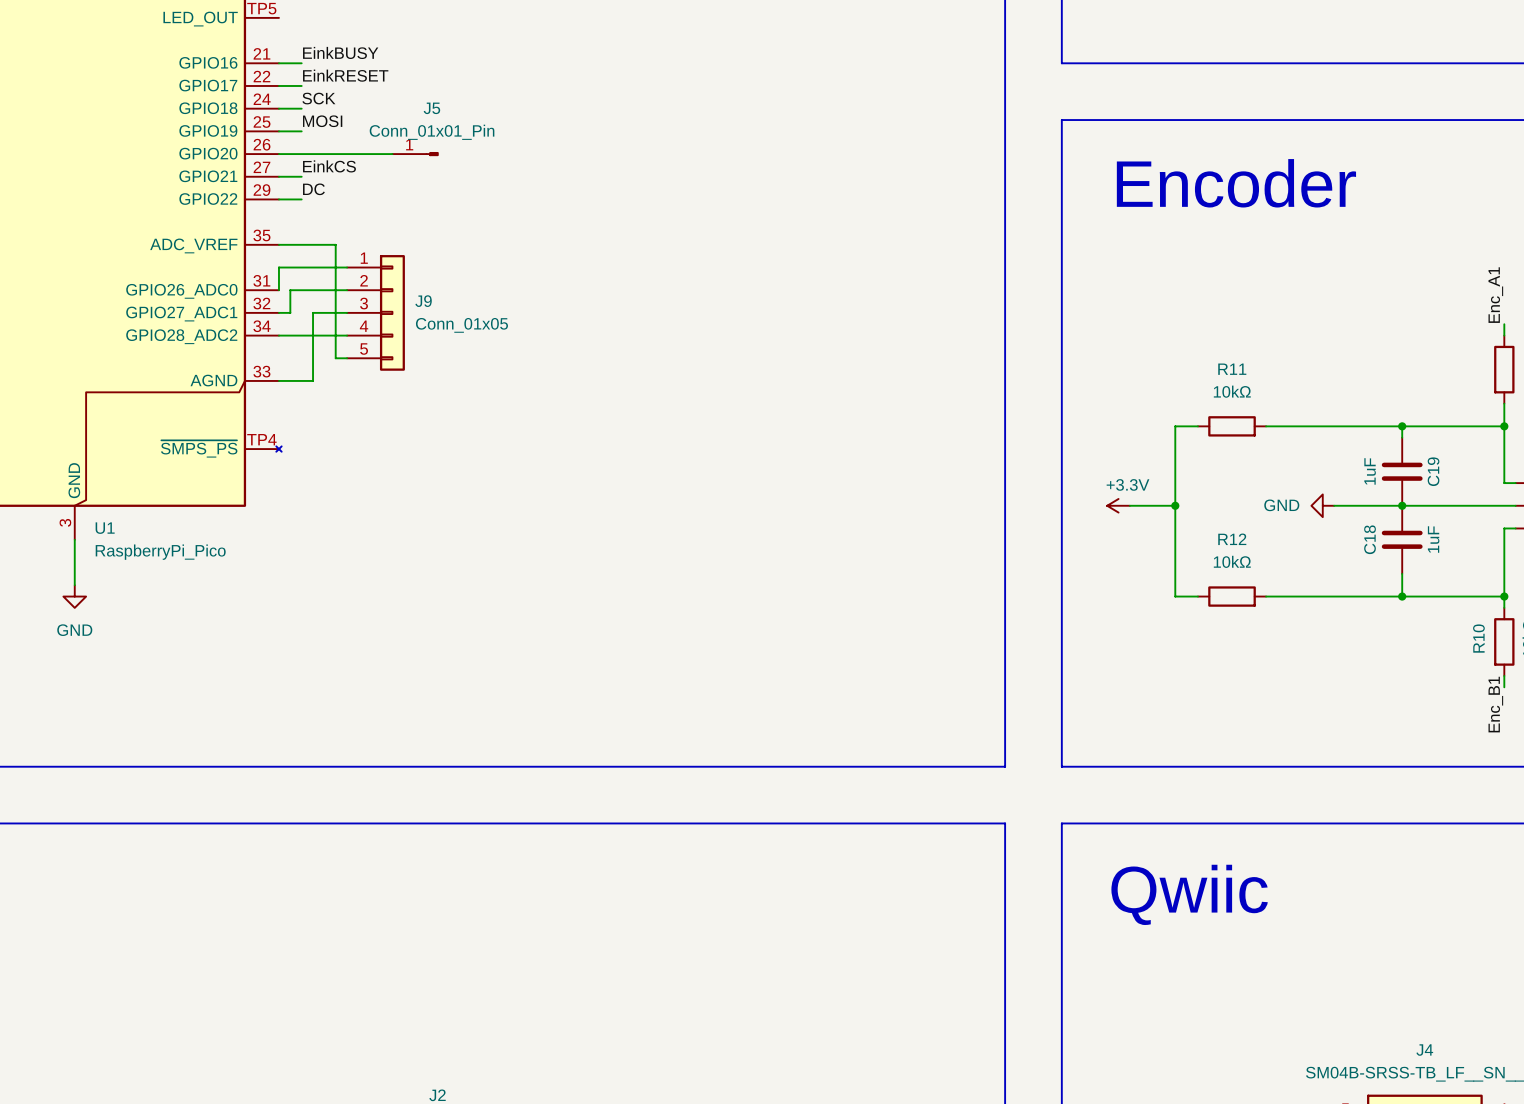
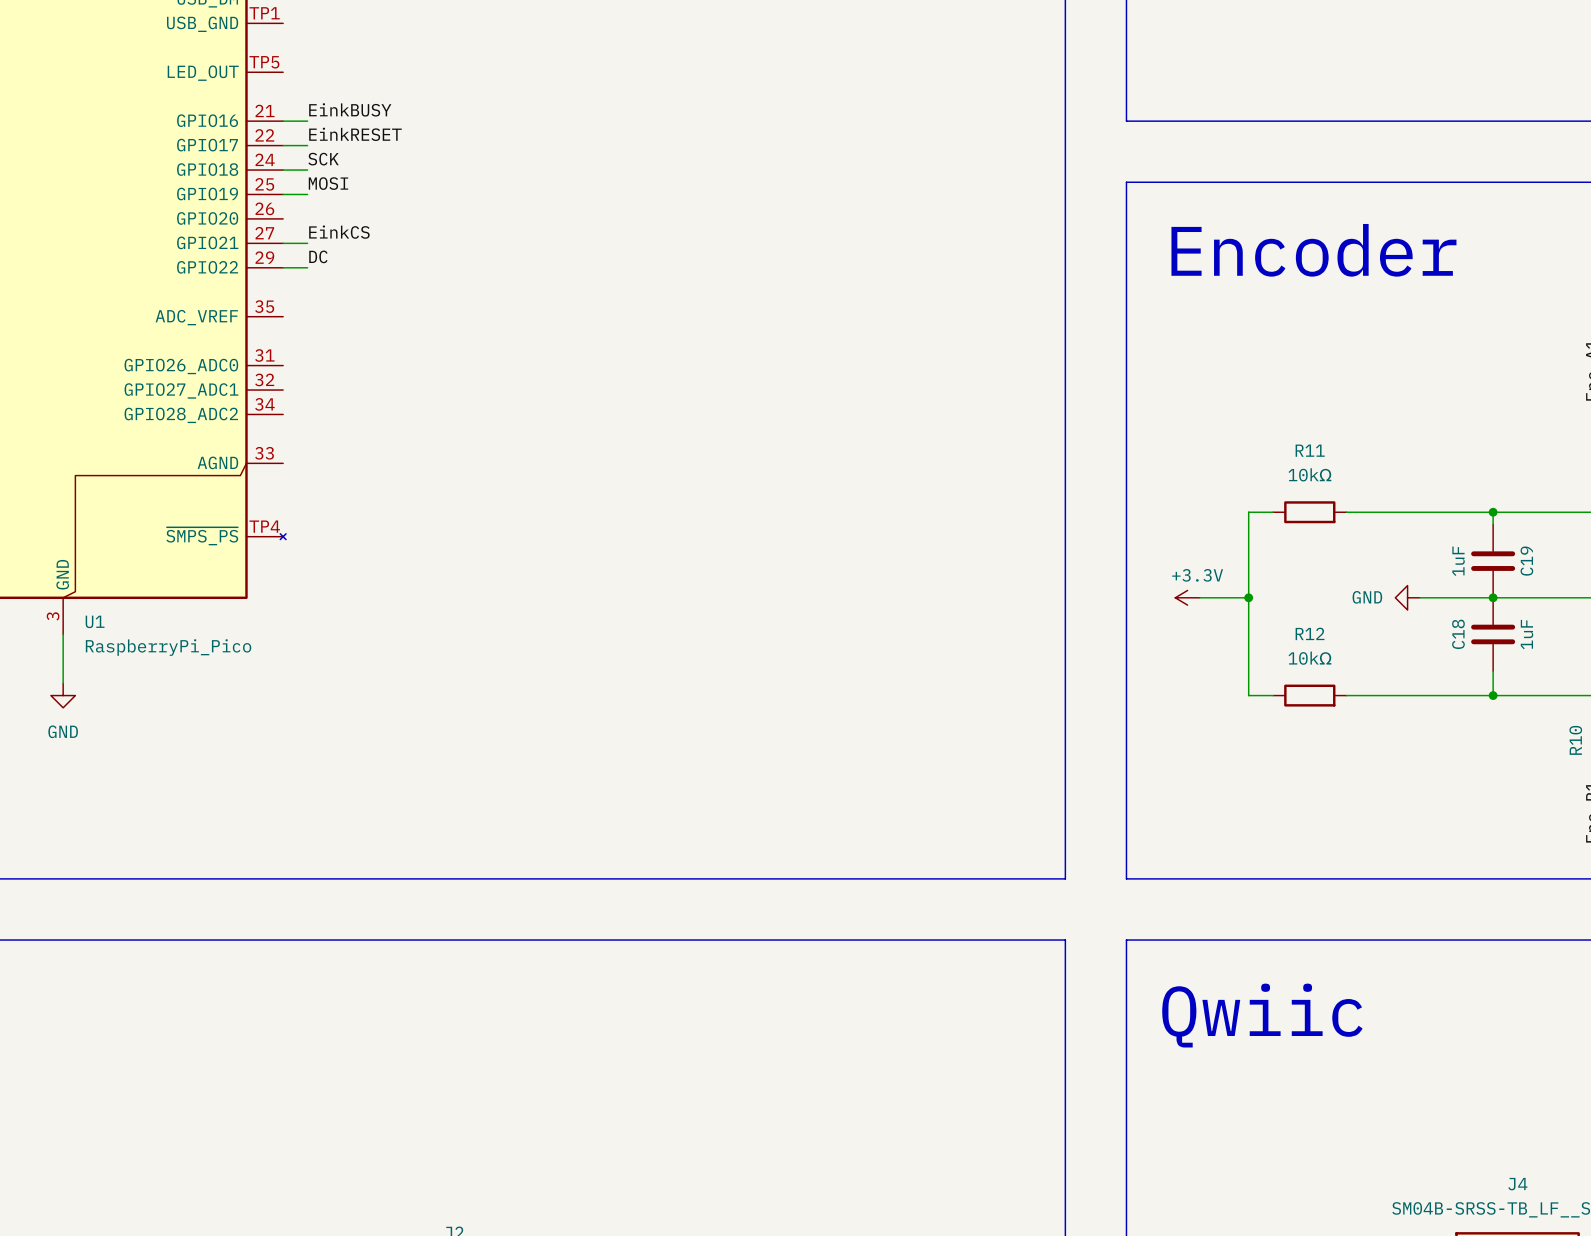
wire: (278, 154) (392, 154) -> none
J5: Conn_01x01_Pin (415, 154) -> none
wire: (278, 244) (335, 244) (335, 358) (347, 358) -> none
wire: (347, 267) (278, 267) (278, 290) -> none
wire: (347, 290) (290, 290) (290, 312) (278, 312) -> none
wire: (347, 312) (313, 312) (313, 380) (278, 380) -> none
J9: Conn_01x05 (375, 312) -> none
wire: (278, 335) (347, 335) -> none

